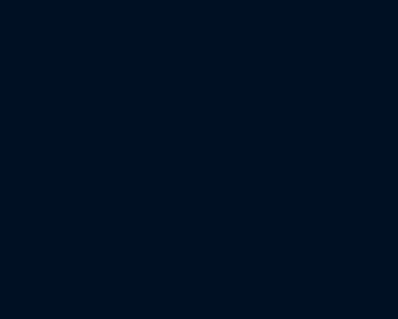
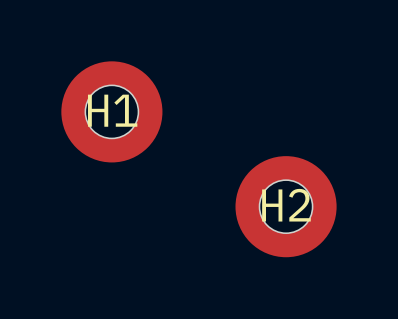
H1: none -> (111, 111)
H2: none -> (286, 206)

